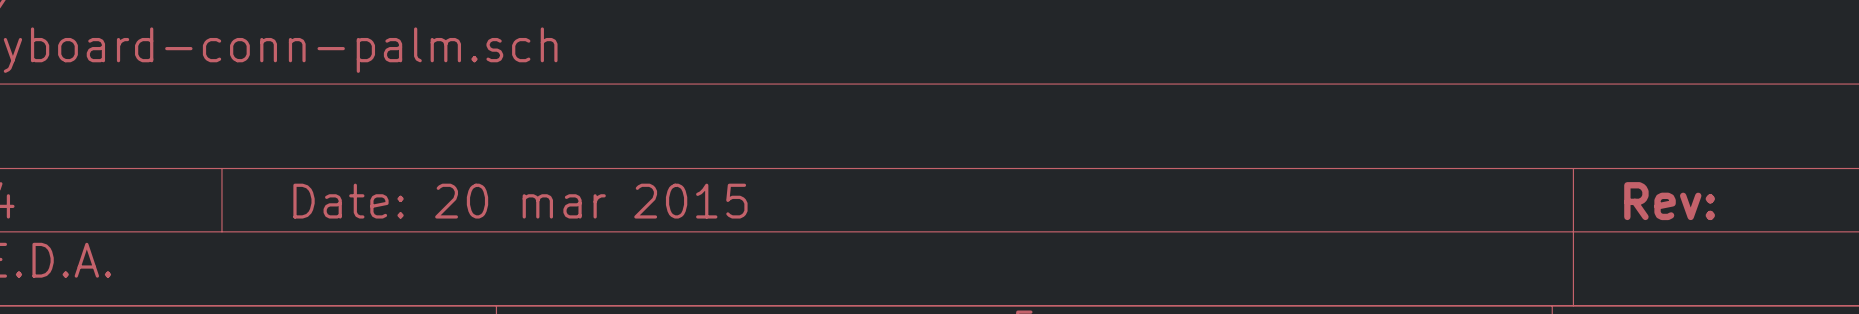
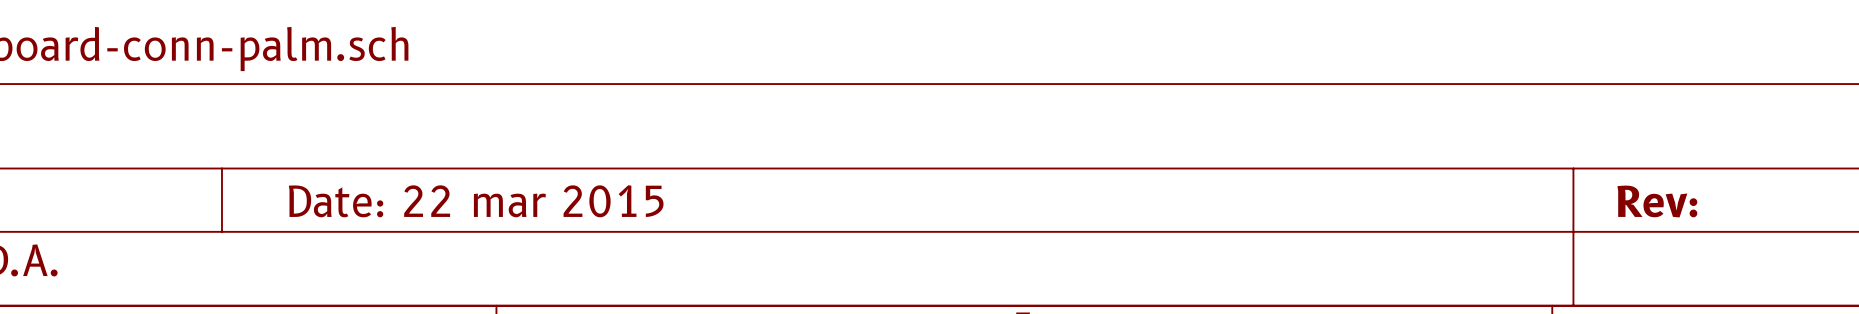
title block: Date: 20 mar 2015 (520, 201) -> Date: 22 mar 2015 (476, 201)

